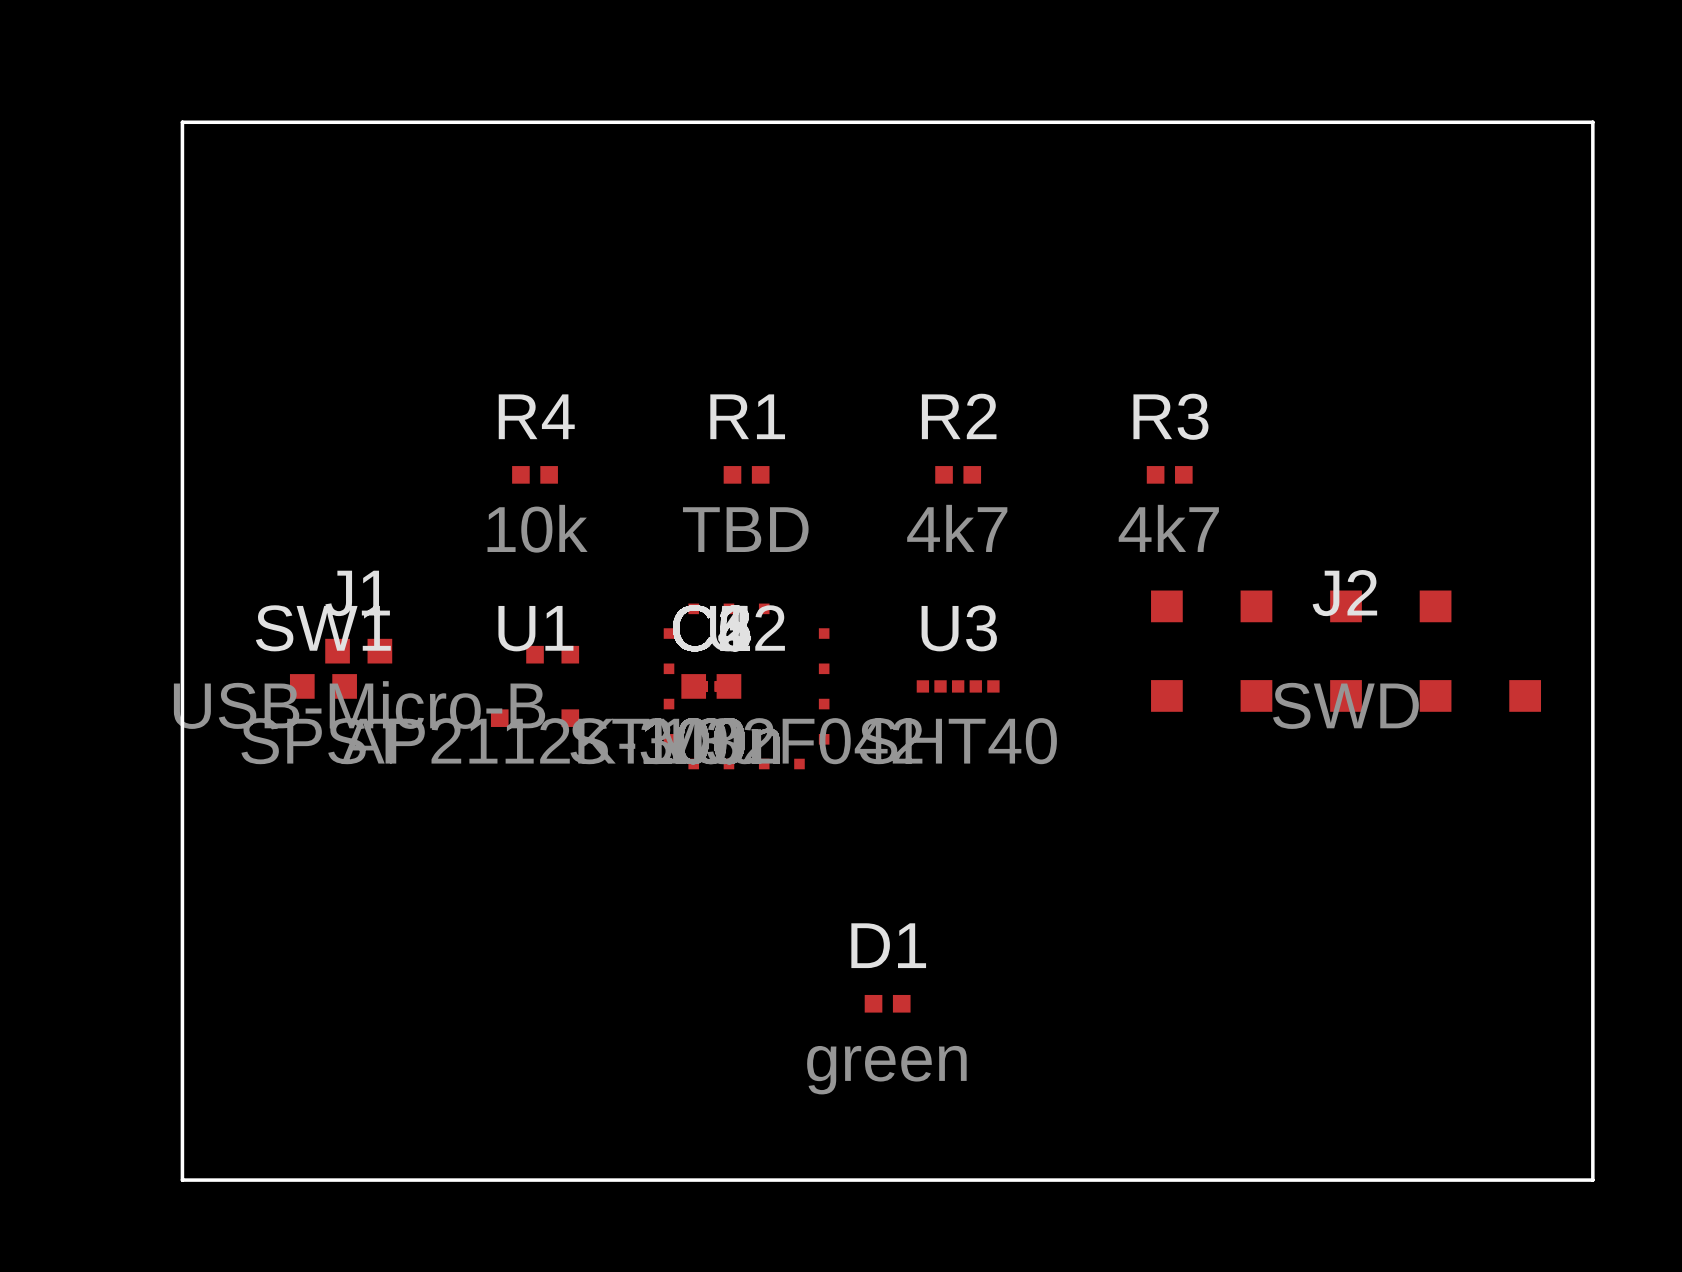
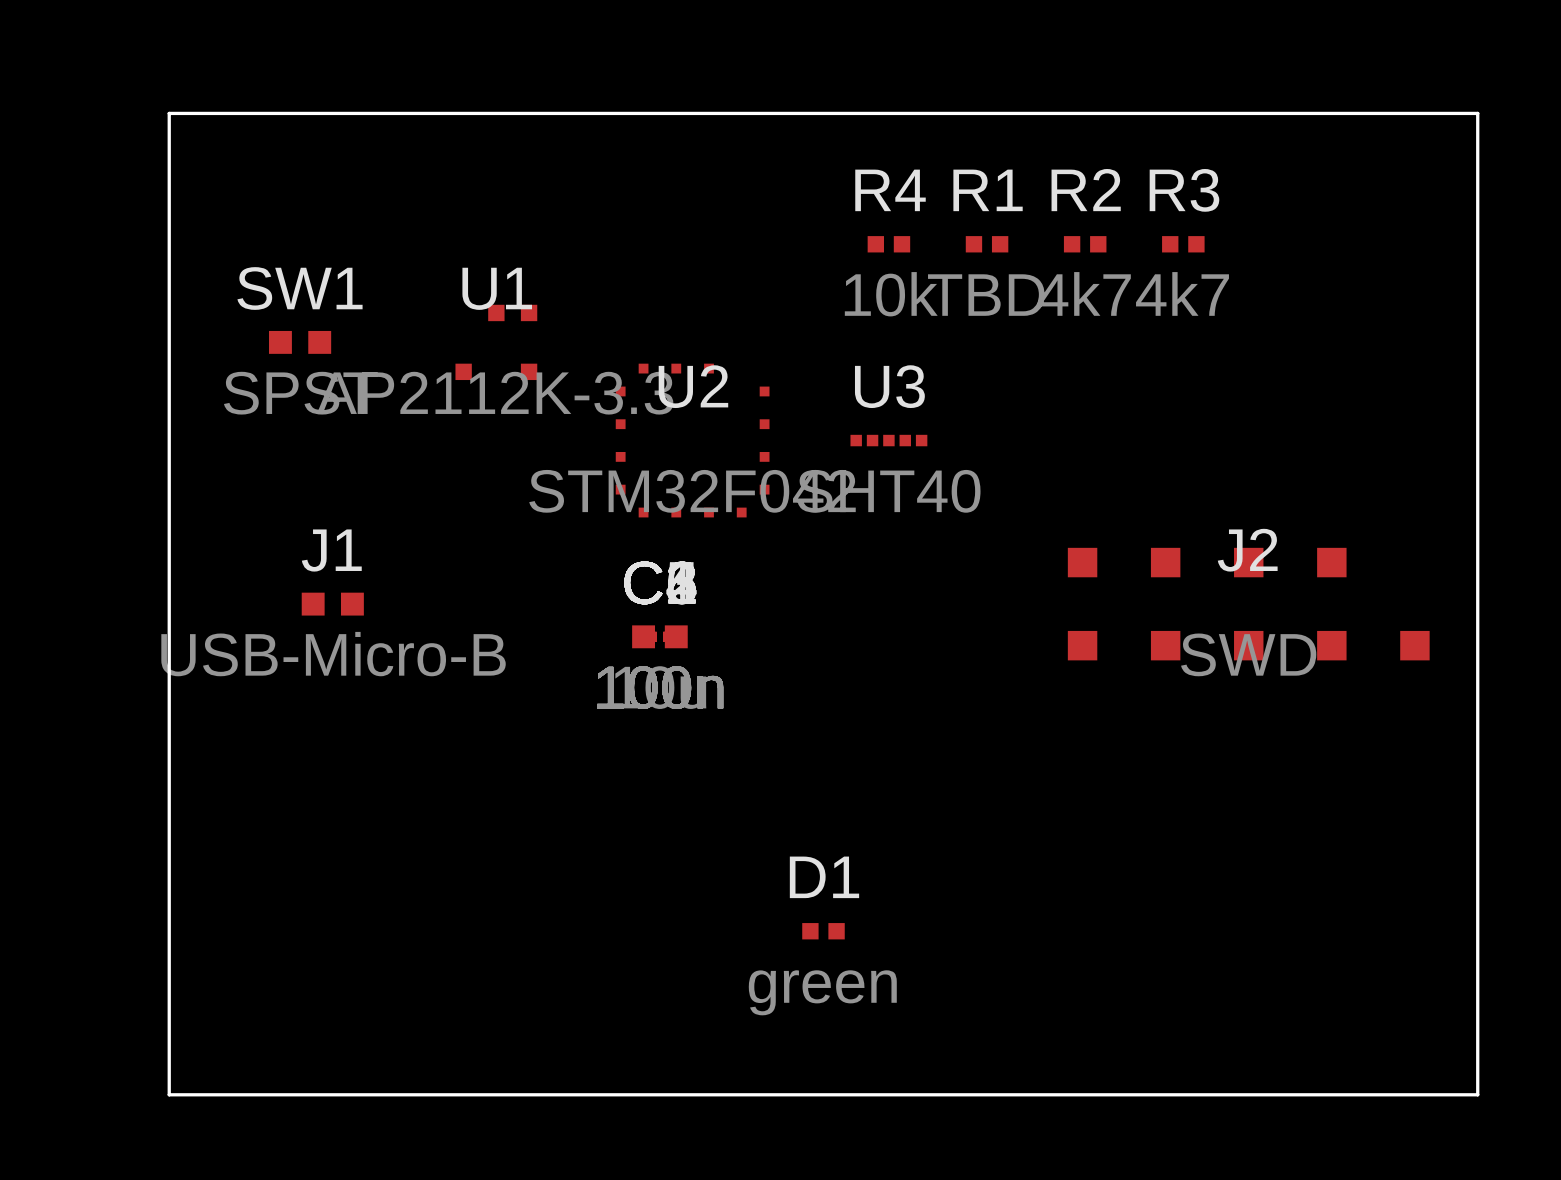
R4 position: (535, 474) -> (888, 244)
R1 position: (746, 474) -> (987, 244)
R2 position: (958, 474) -> (1085, 244)
R3 position: (1169, 474) -> (1183, 244)
SW1 position: (323, 686) -> (300, 342)
U1 position: (535, 686) -> (496, 342)
U2 position: (746, 686) -> (692, 440)
U3 position: (958, 686) -> (888, 440)

